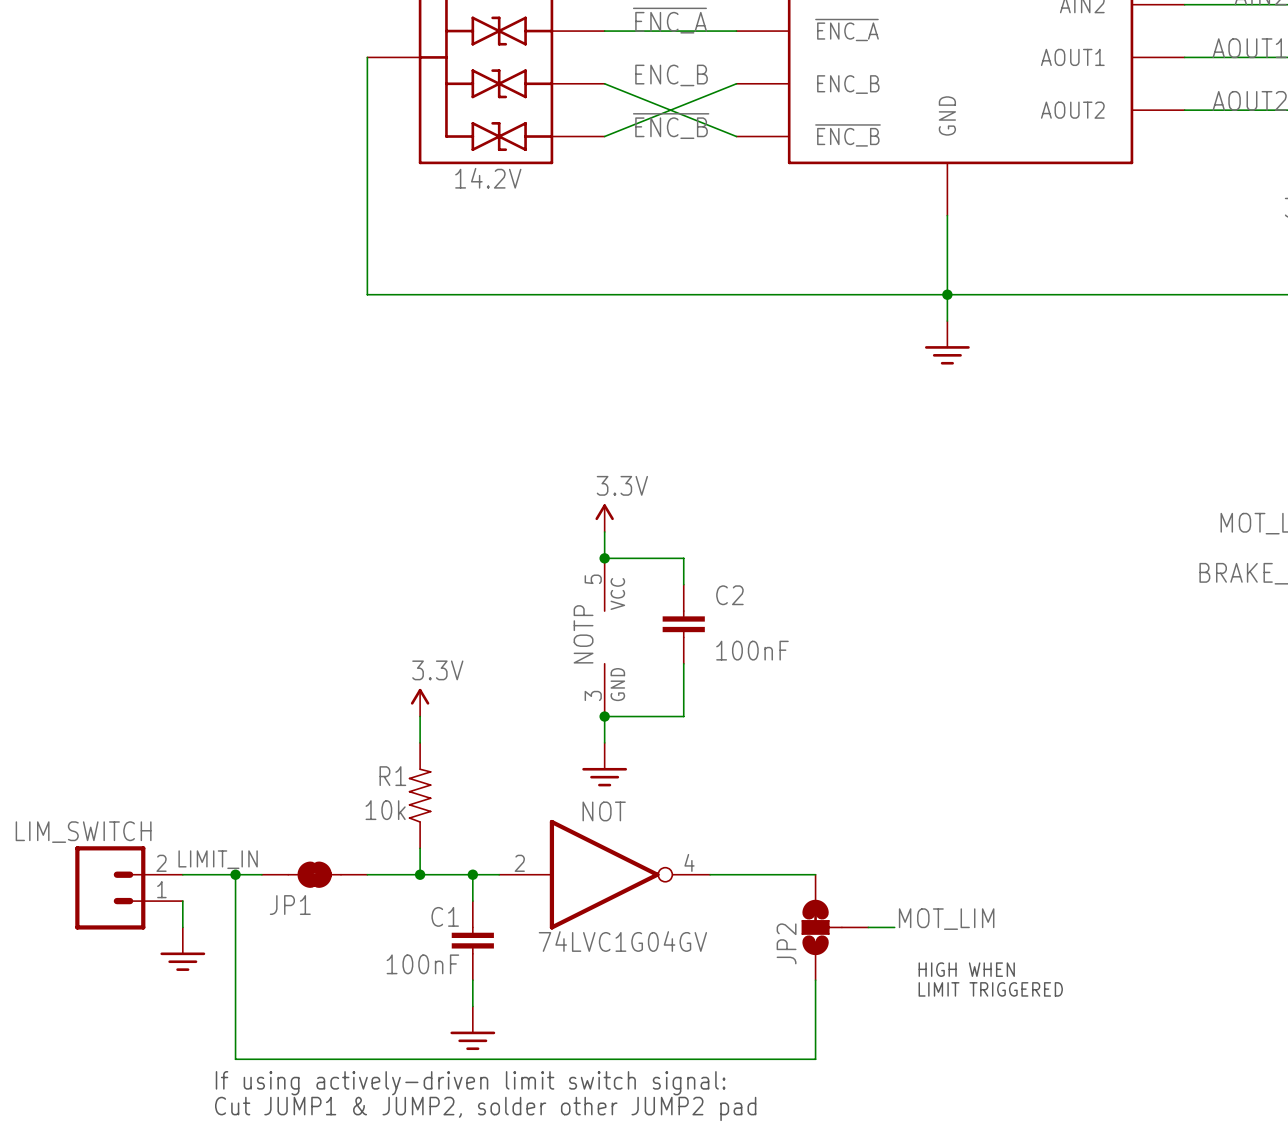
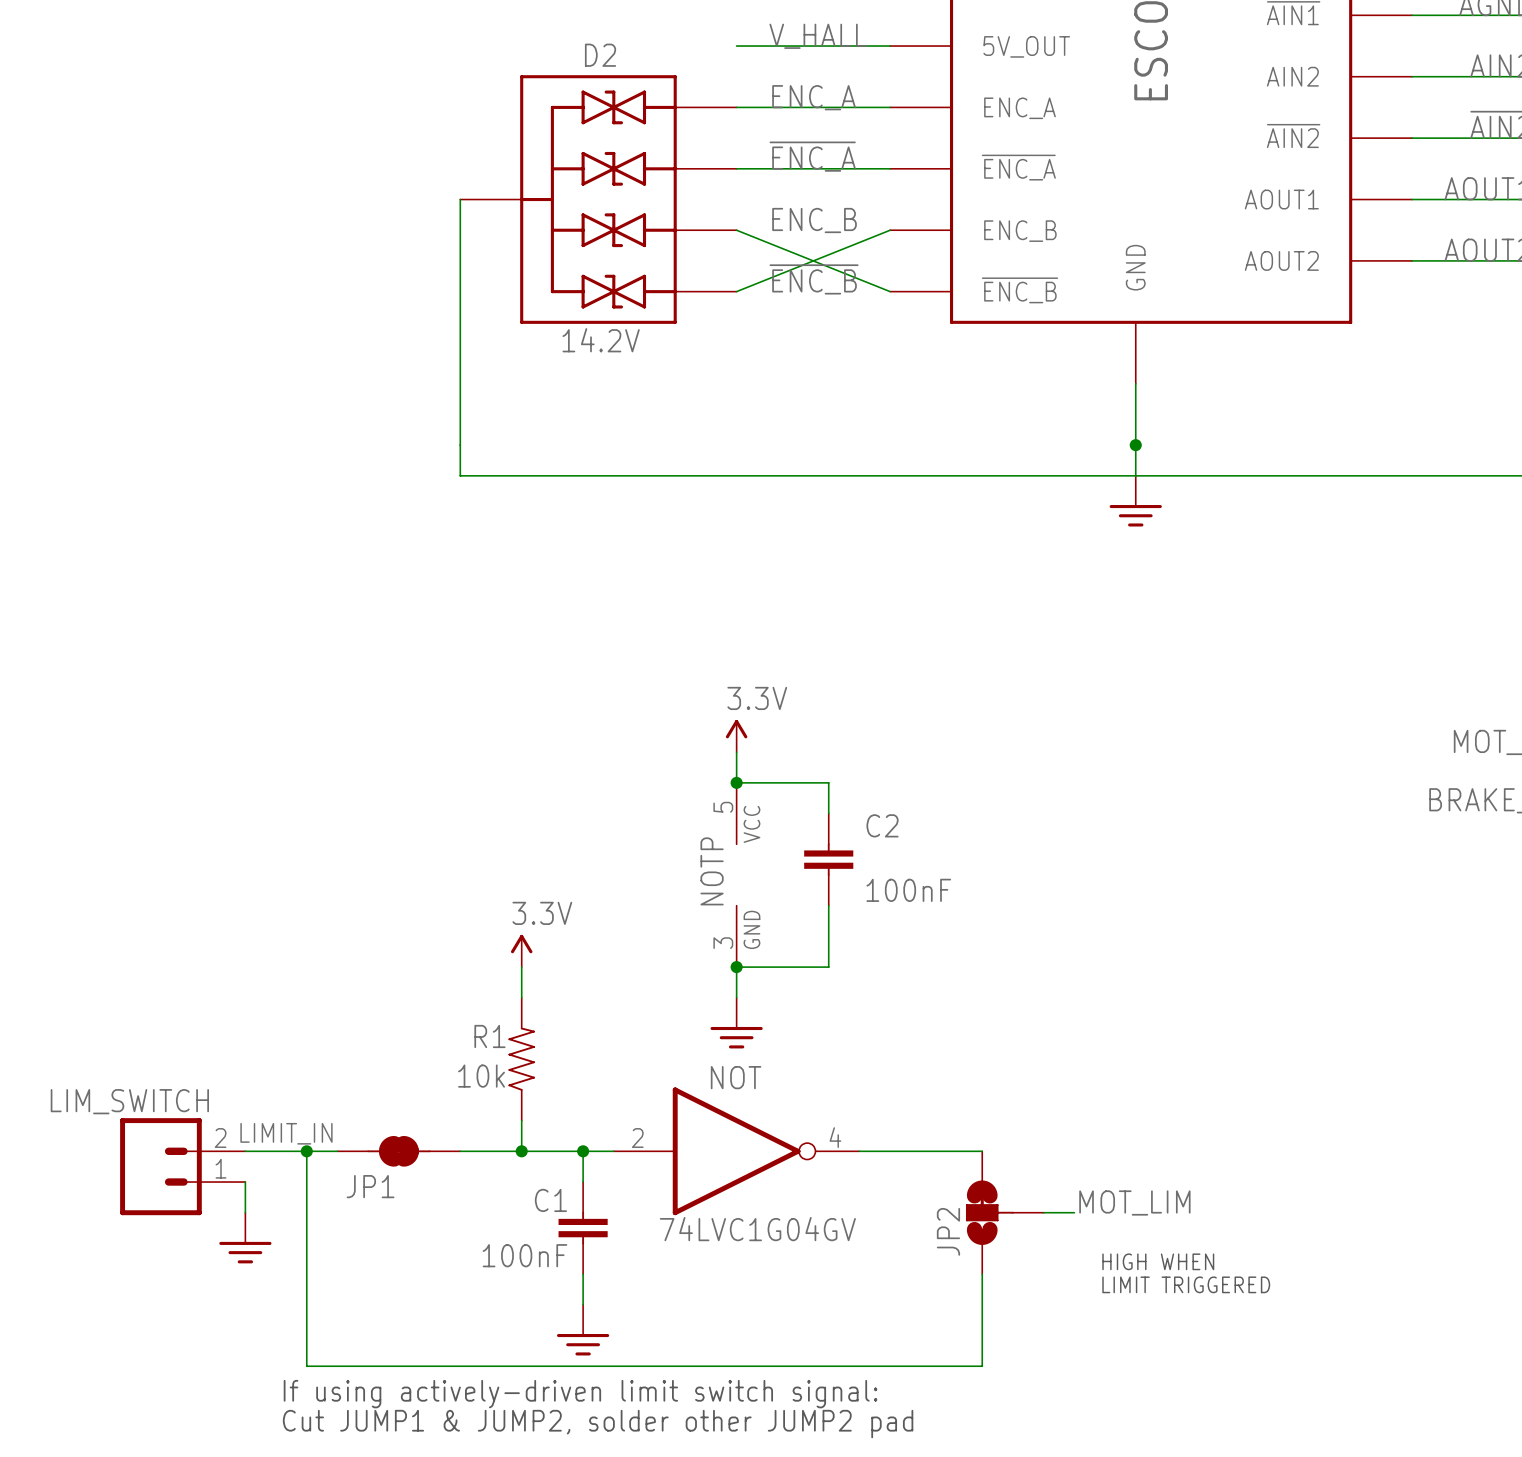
junction position: (947, 294) -> (1135, 445)
power symbol position: (947, 342) -> (1135, 501)

